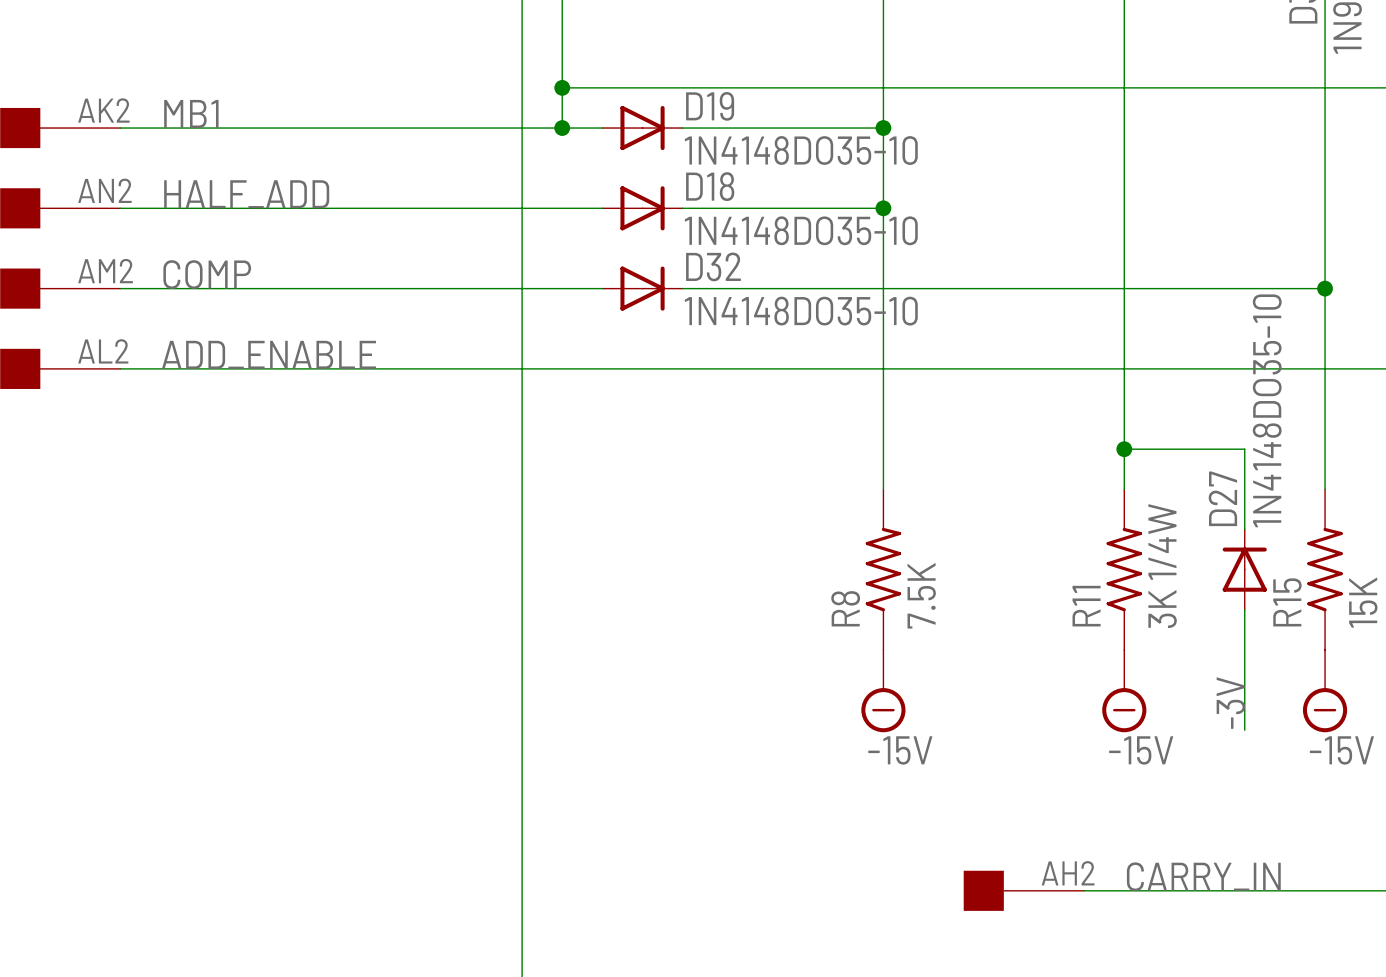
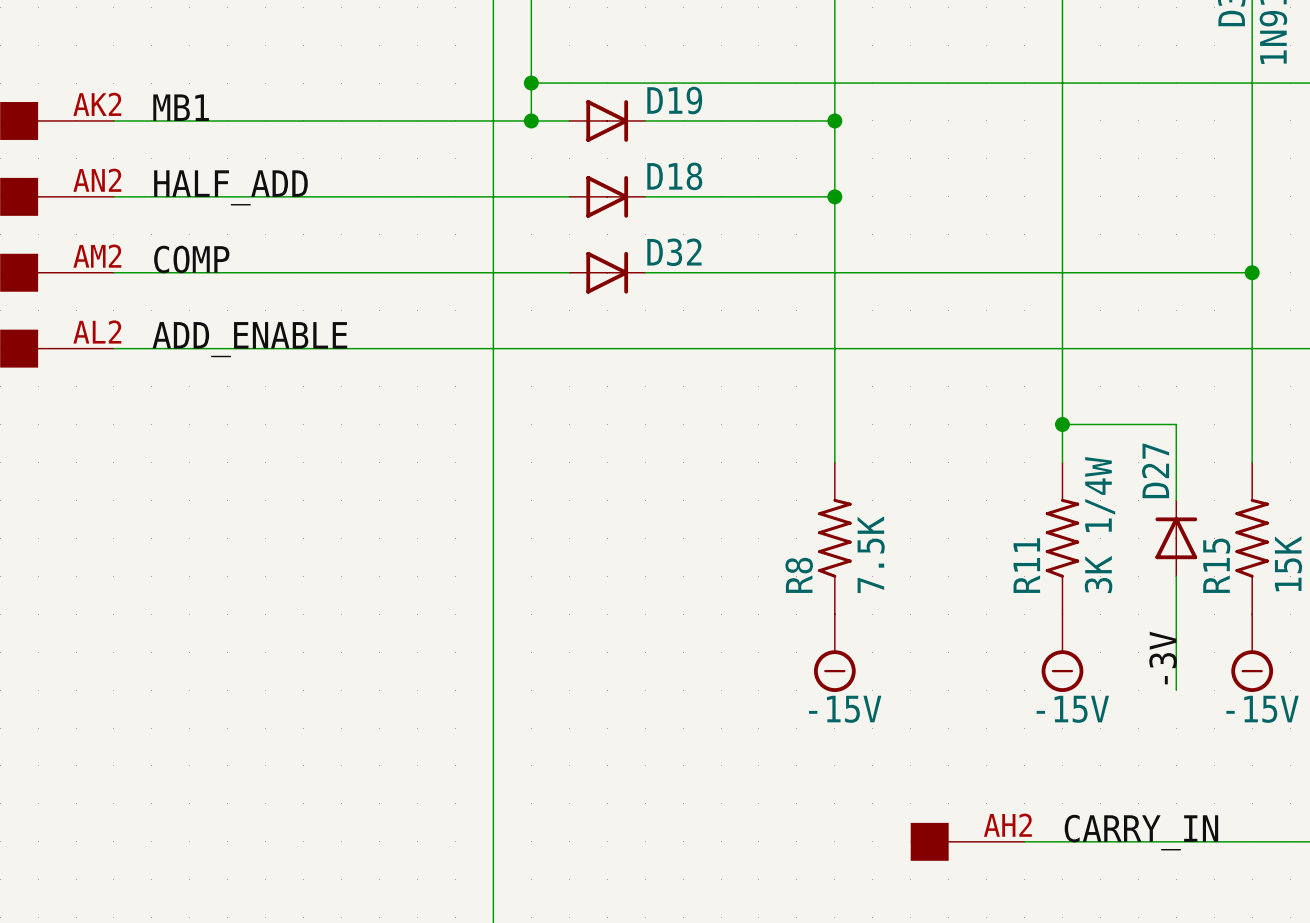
D19 value: 1N4148DO35-10 (801, 150) -> none
D18 value: 1N4148DO35-10 (801, 230) -> none
D32 value: 1N4148DO35-10 (801, 311) -> none
D27 value: 1N4148DO35-10 (1267, 410) -> none

